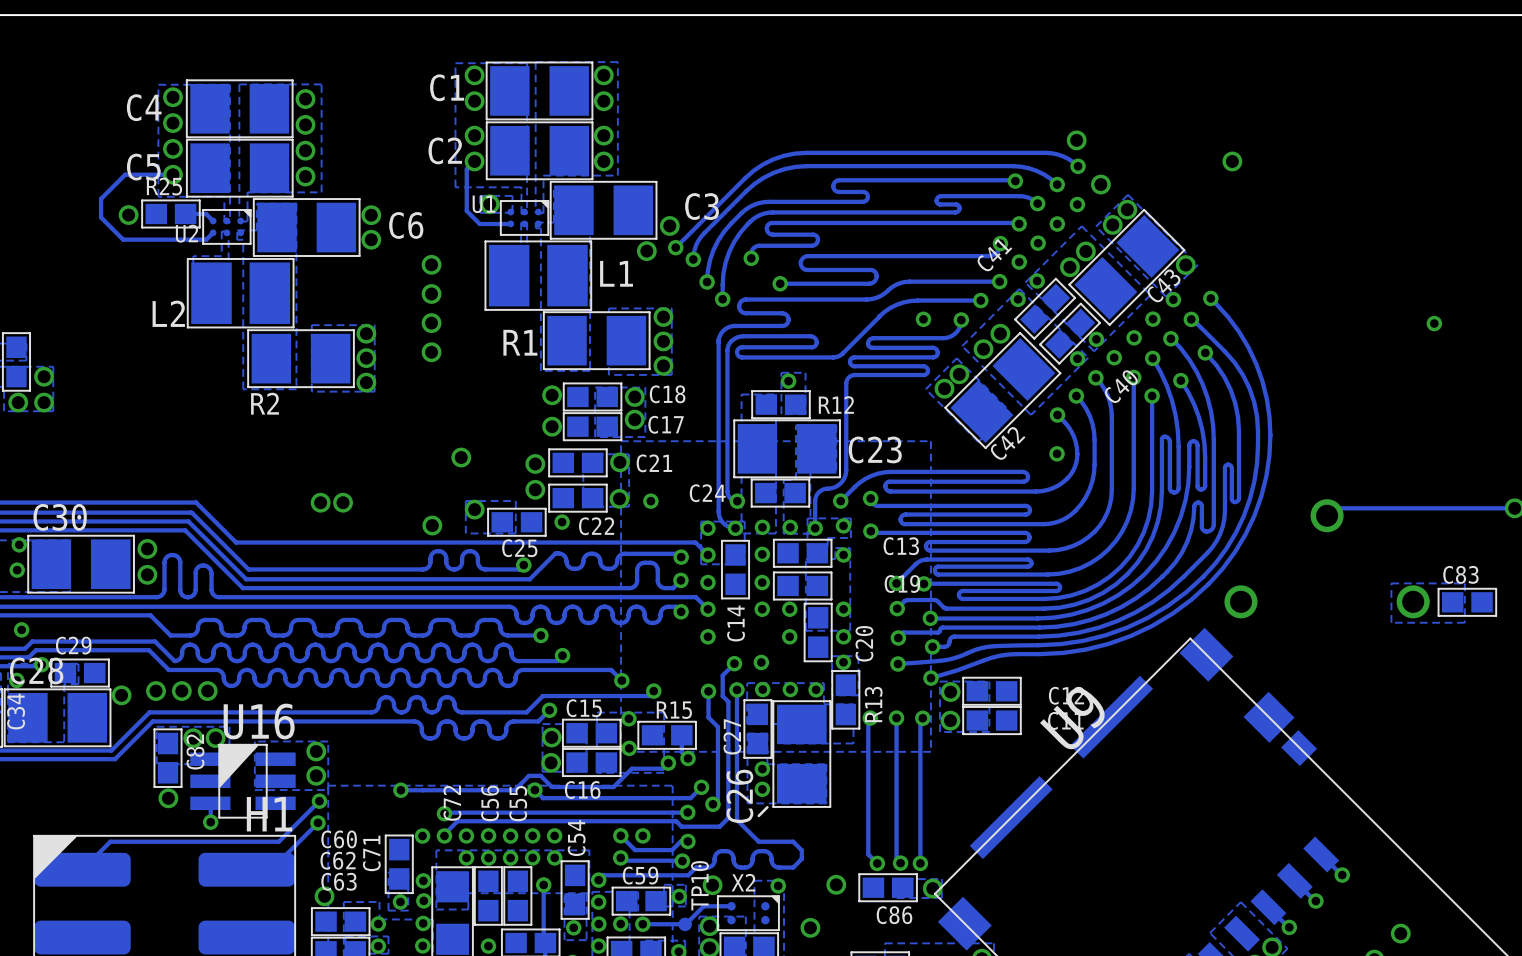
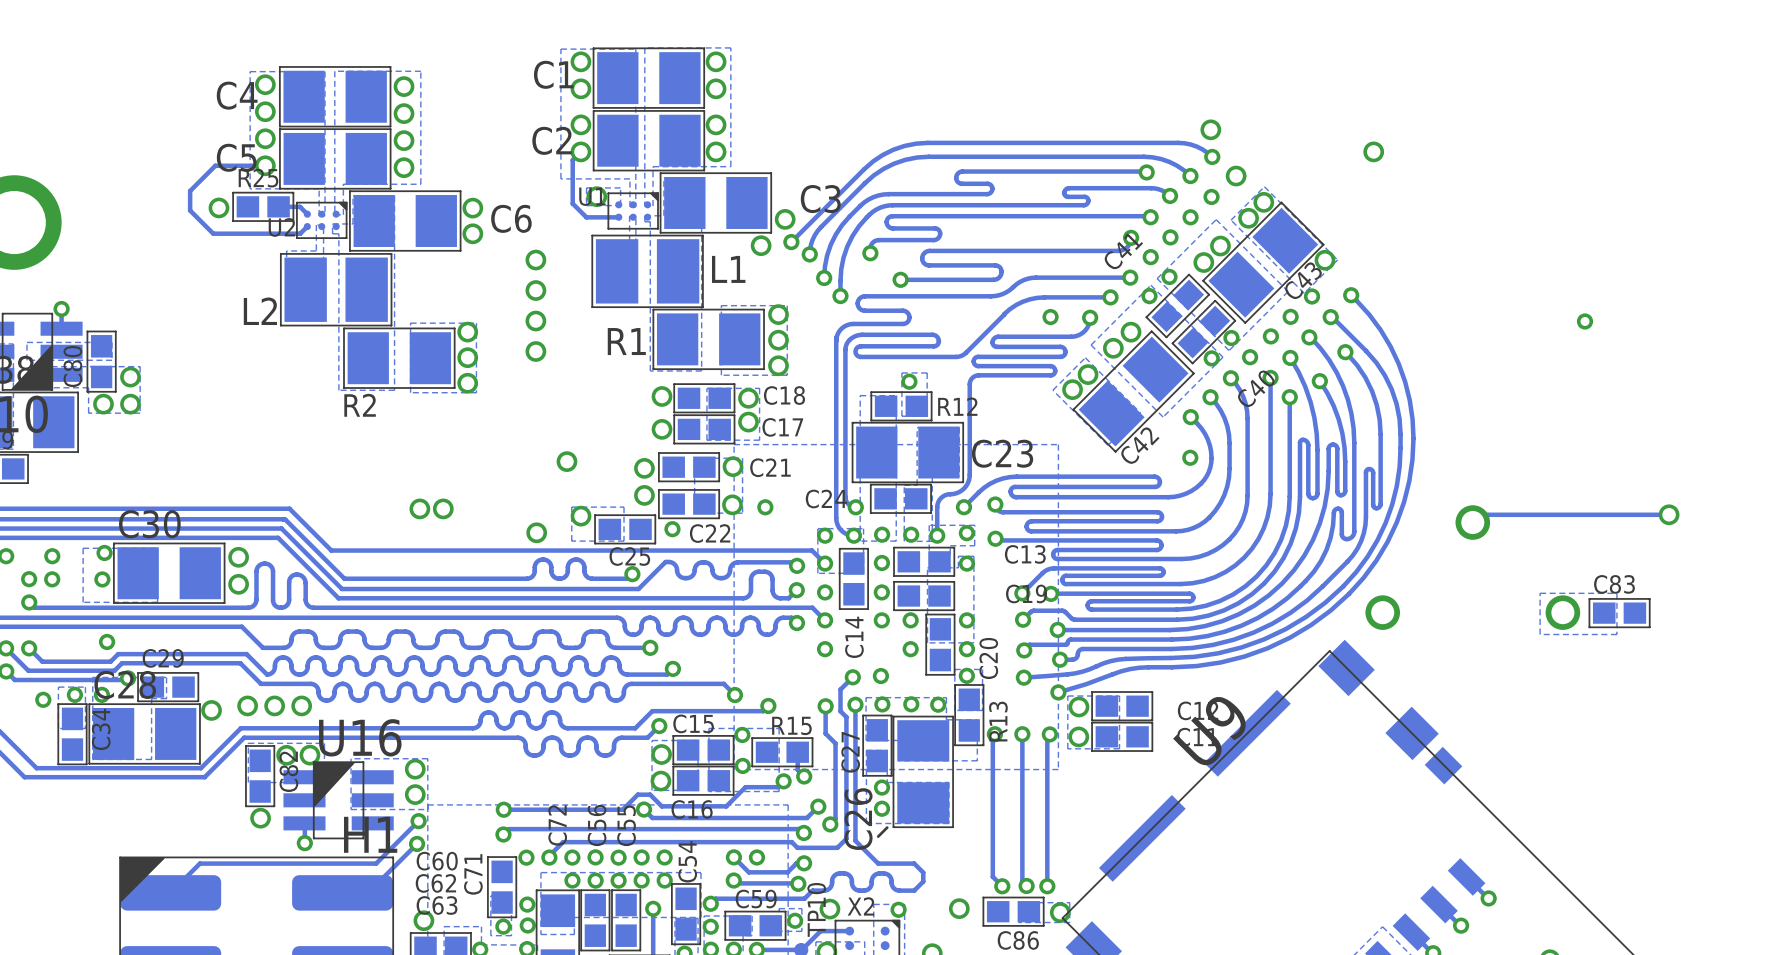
track: (687, 812) (444, 813) -> (803, 832) (799, 829) (508, 829) (503, 834)
via position: (444, 813) -> (503, 834)

